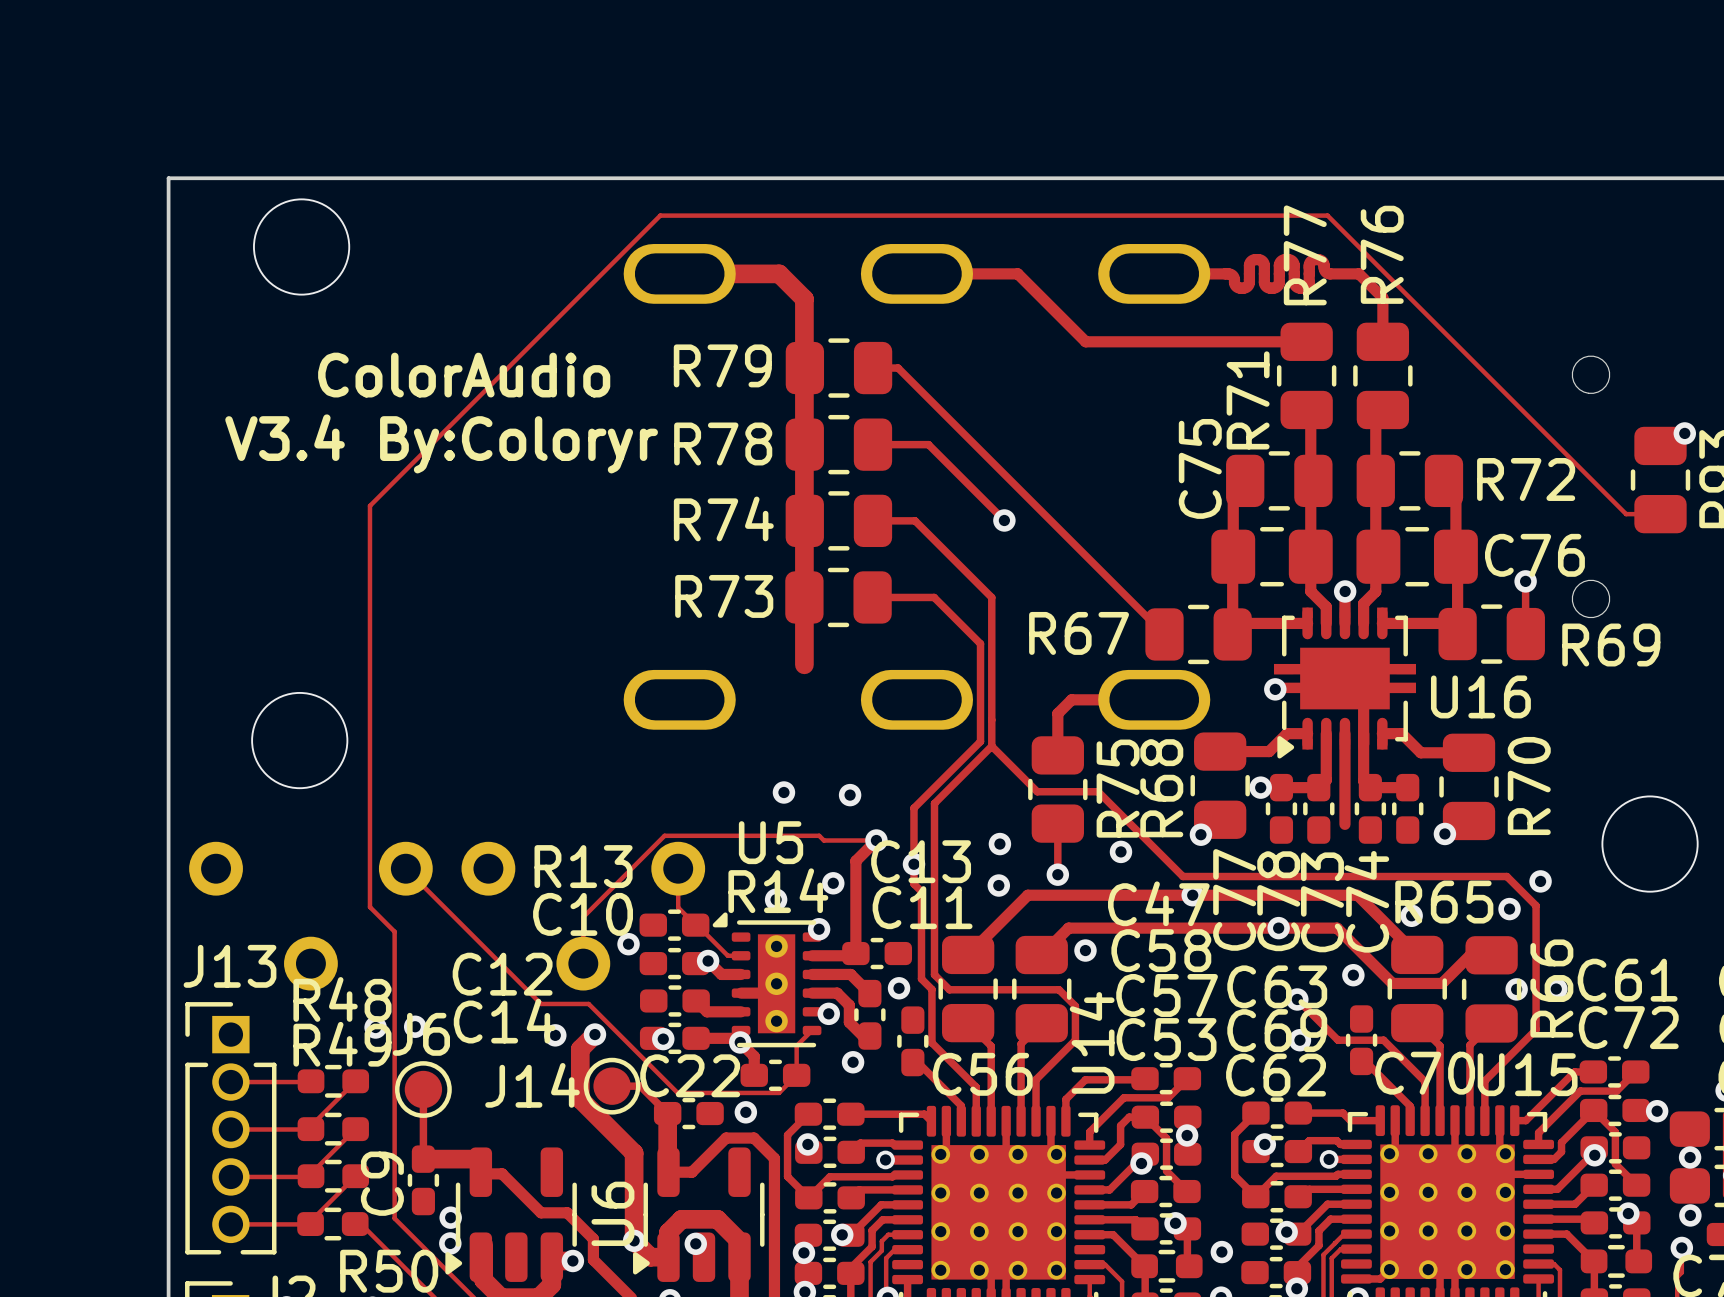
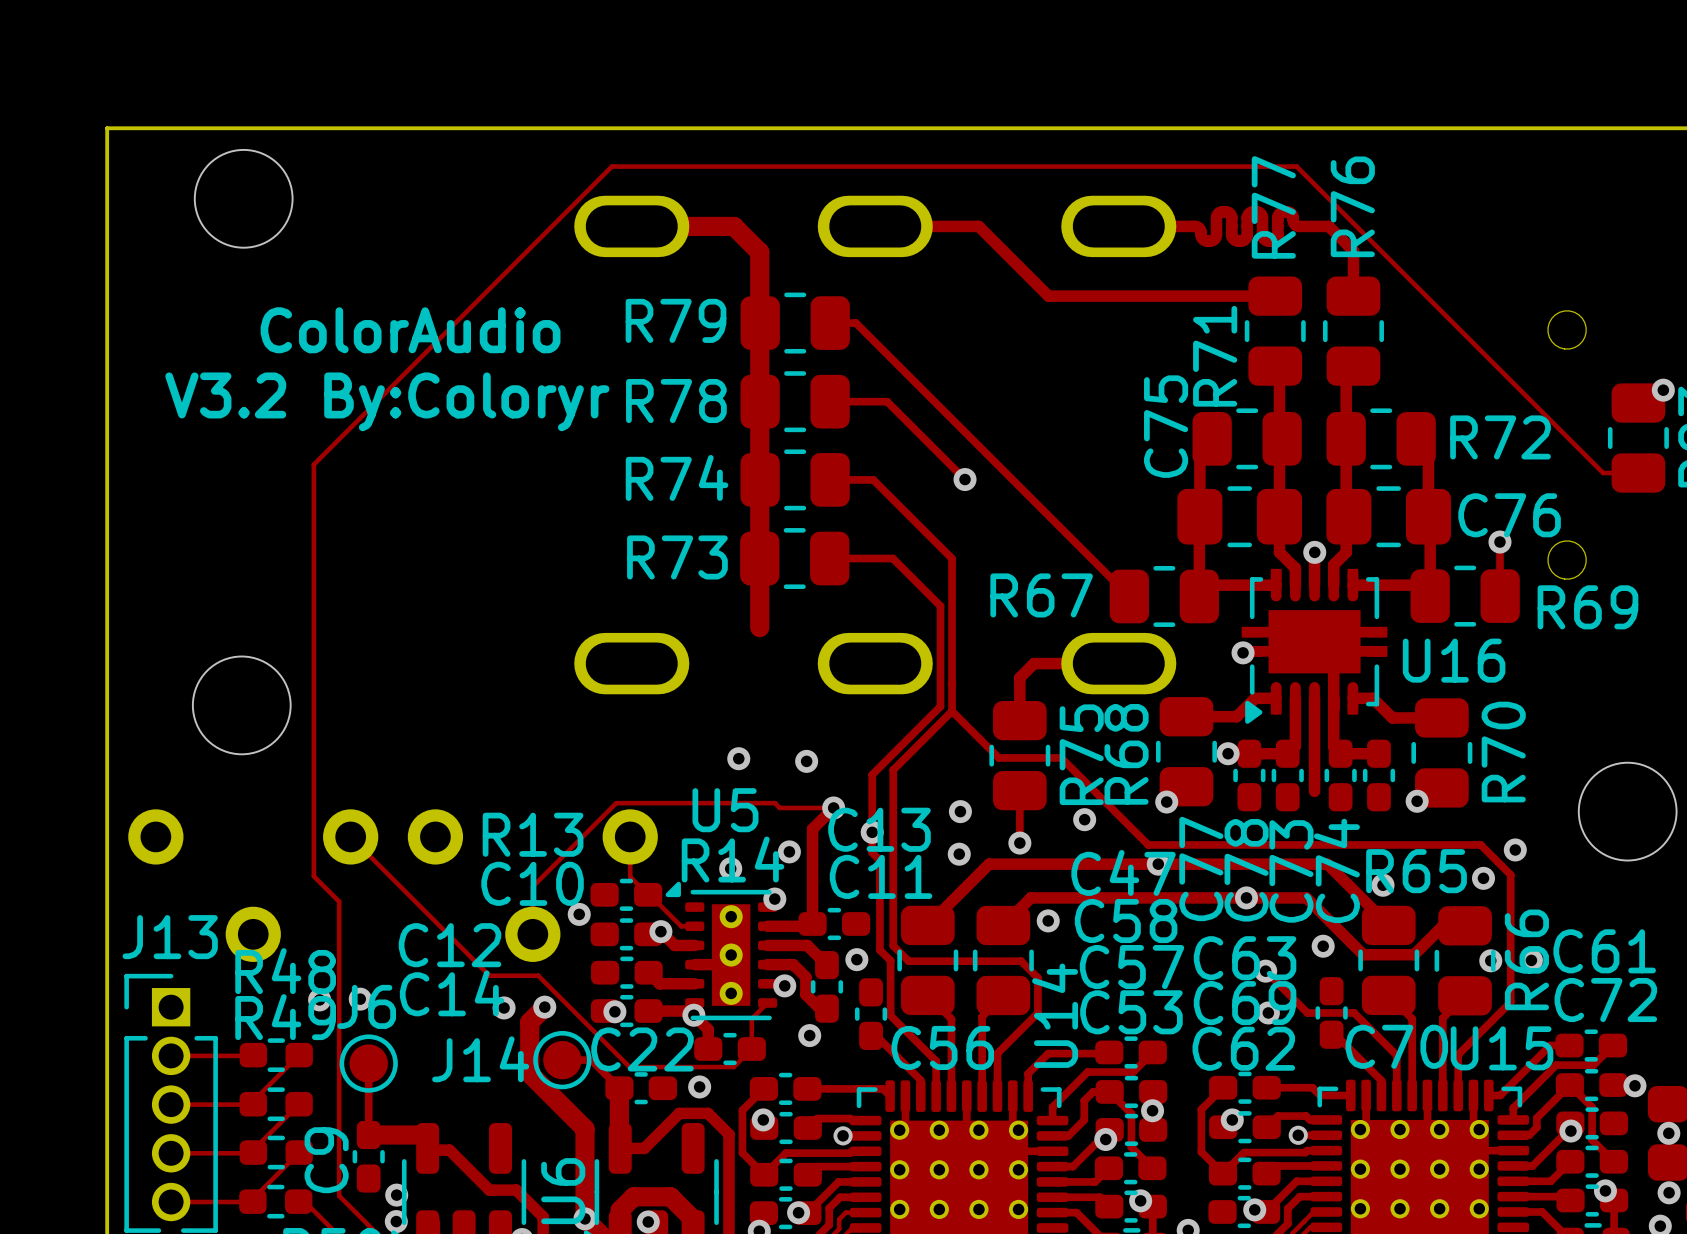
text: V3.4 By:Coloryr (441, 443) -> V3.2 By:Coloryr (387, 401)

